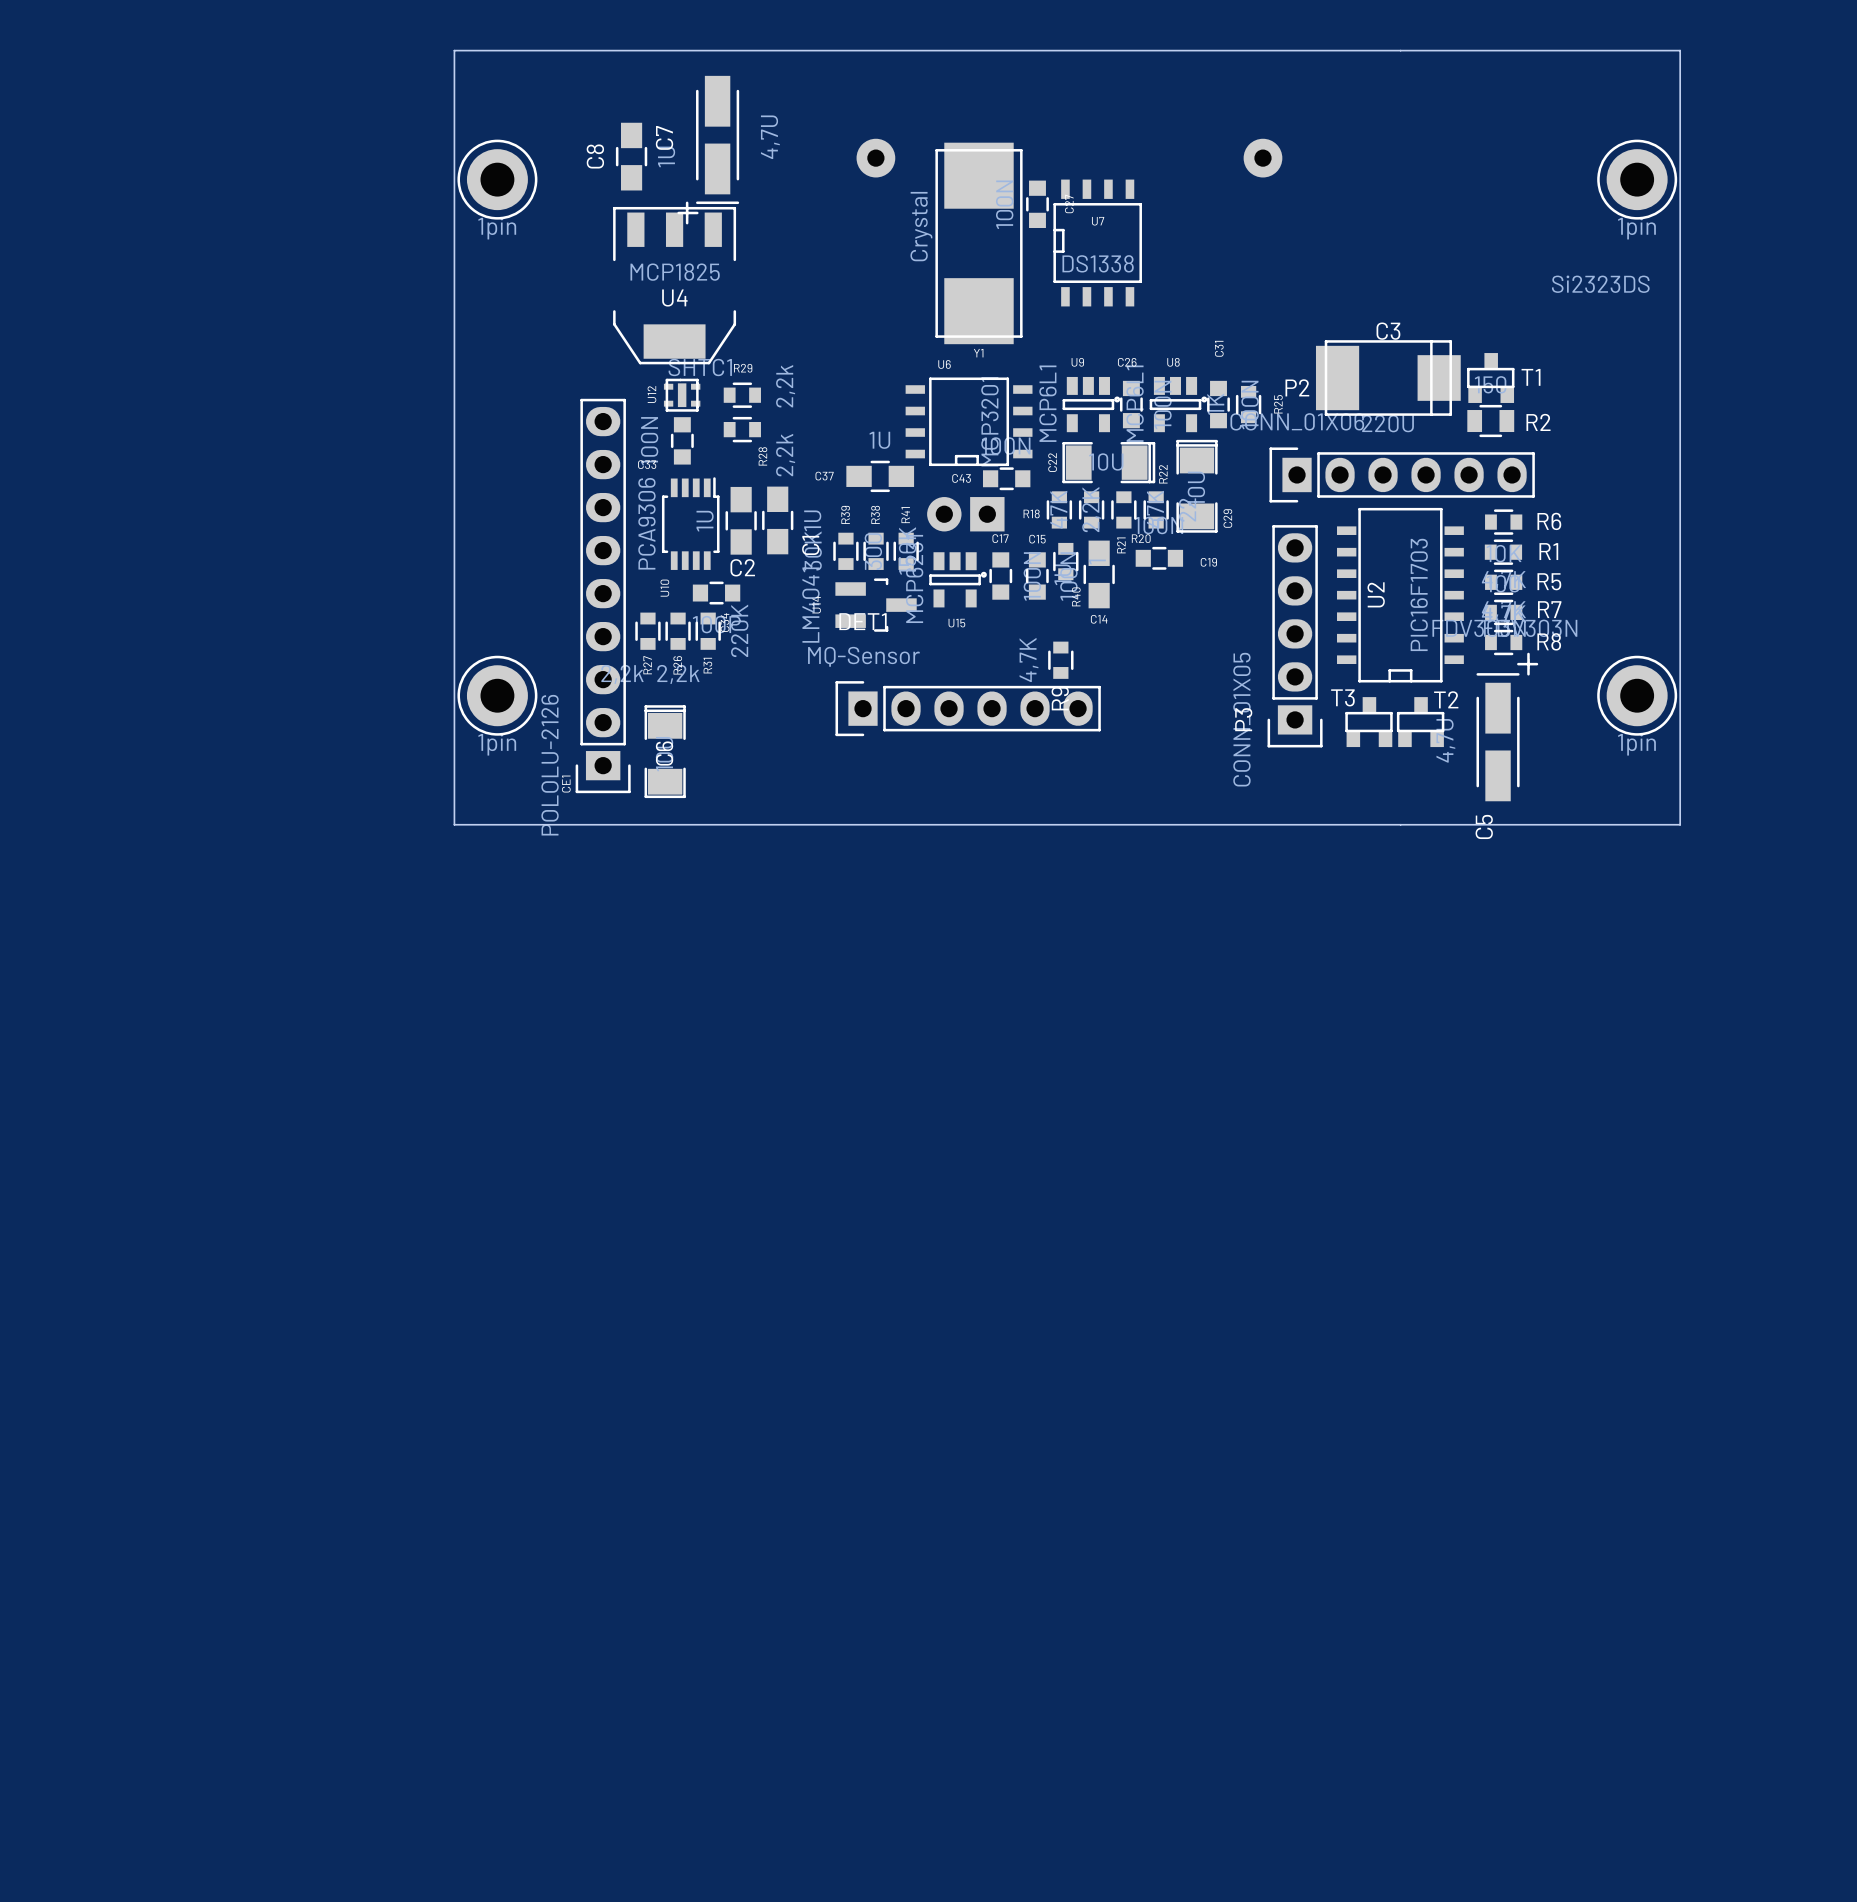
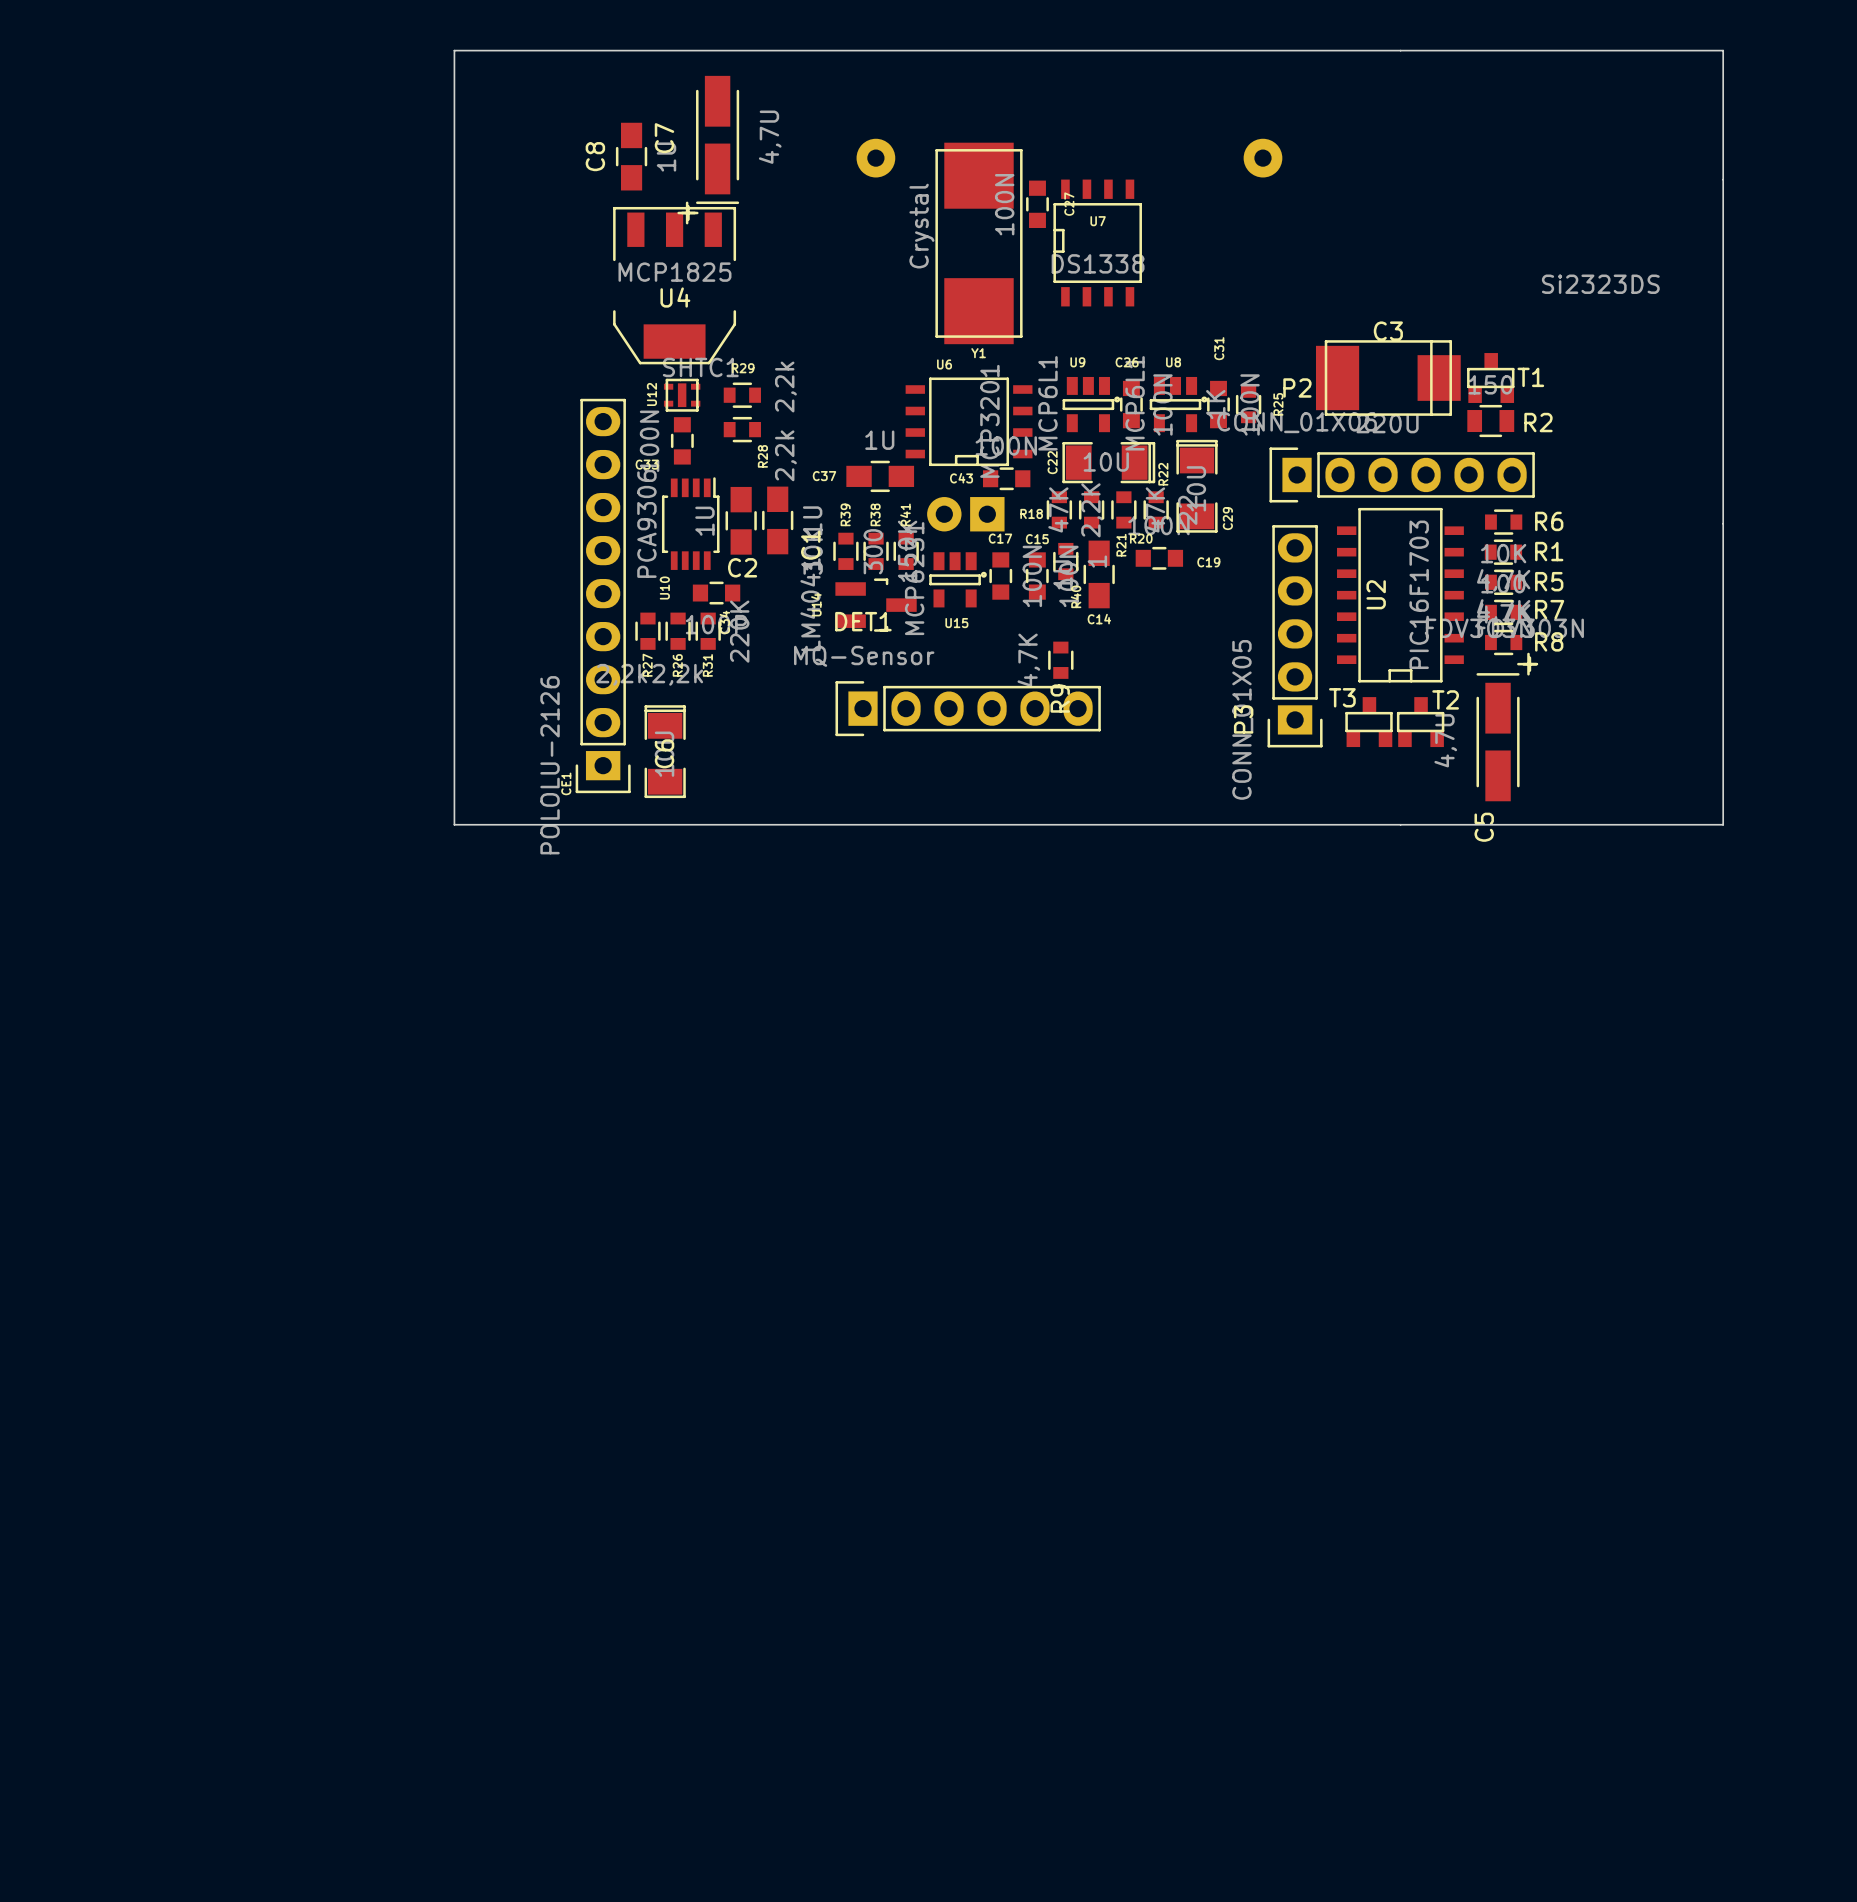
board edge: (1680, 50) (1680, 824) -> (1680, 50) (1723, 50) (1723, 824) (1680, 824)
part: 1pin (497, 179) -> none
part: 1pin (1637, 179) -> none
part: 1pin (497, 695) -> none
part: 1pin (1637, 695) -> none

